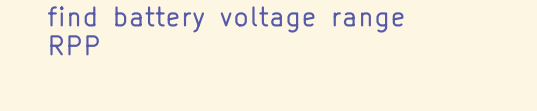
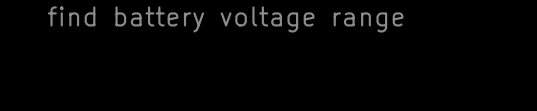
text: RPP (74, 45) -> none

